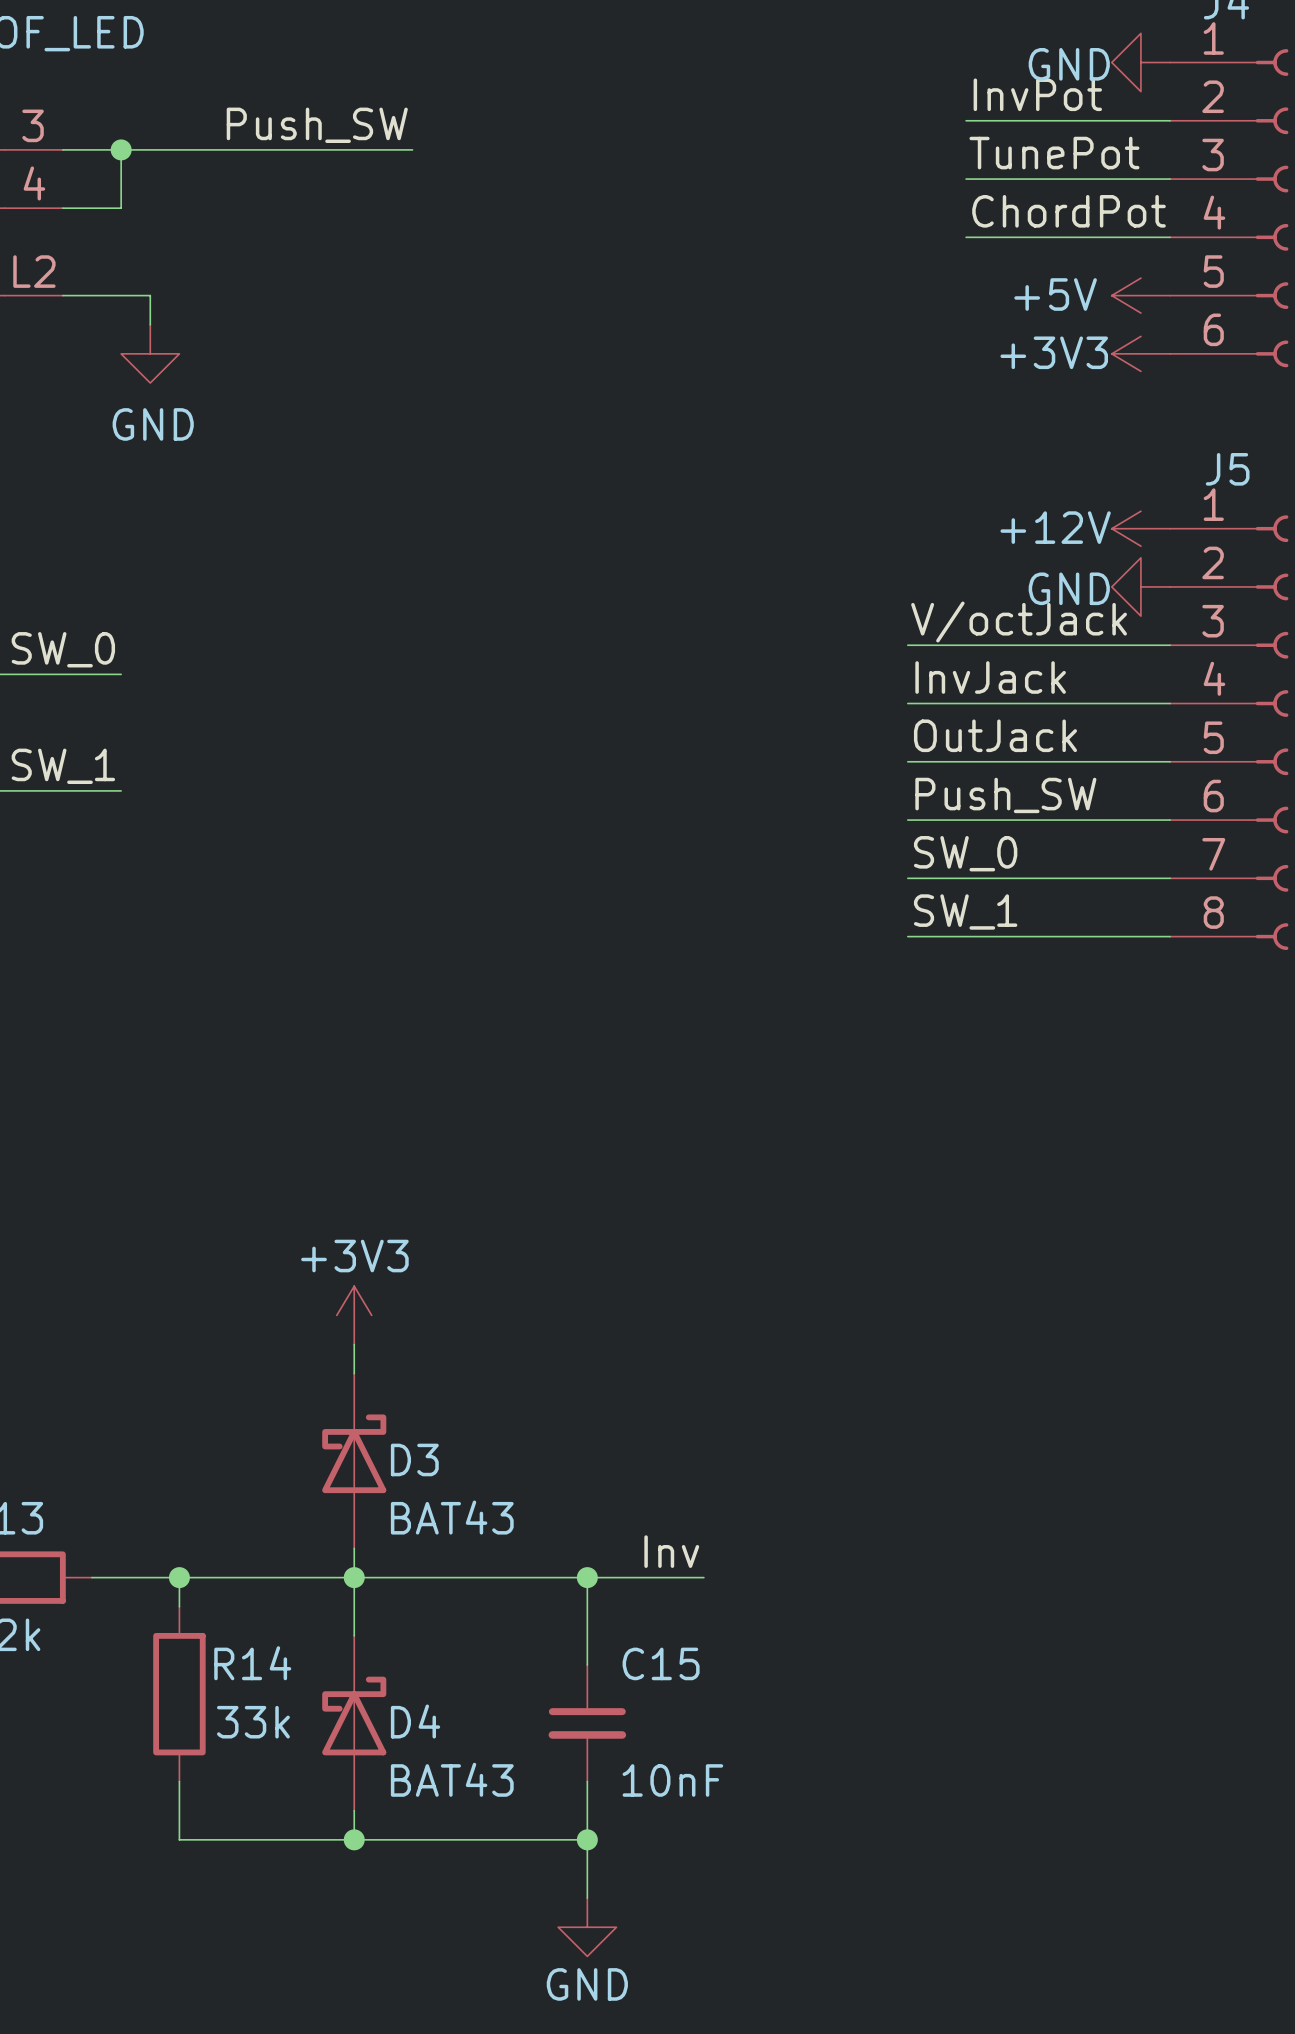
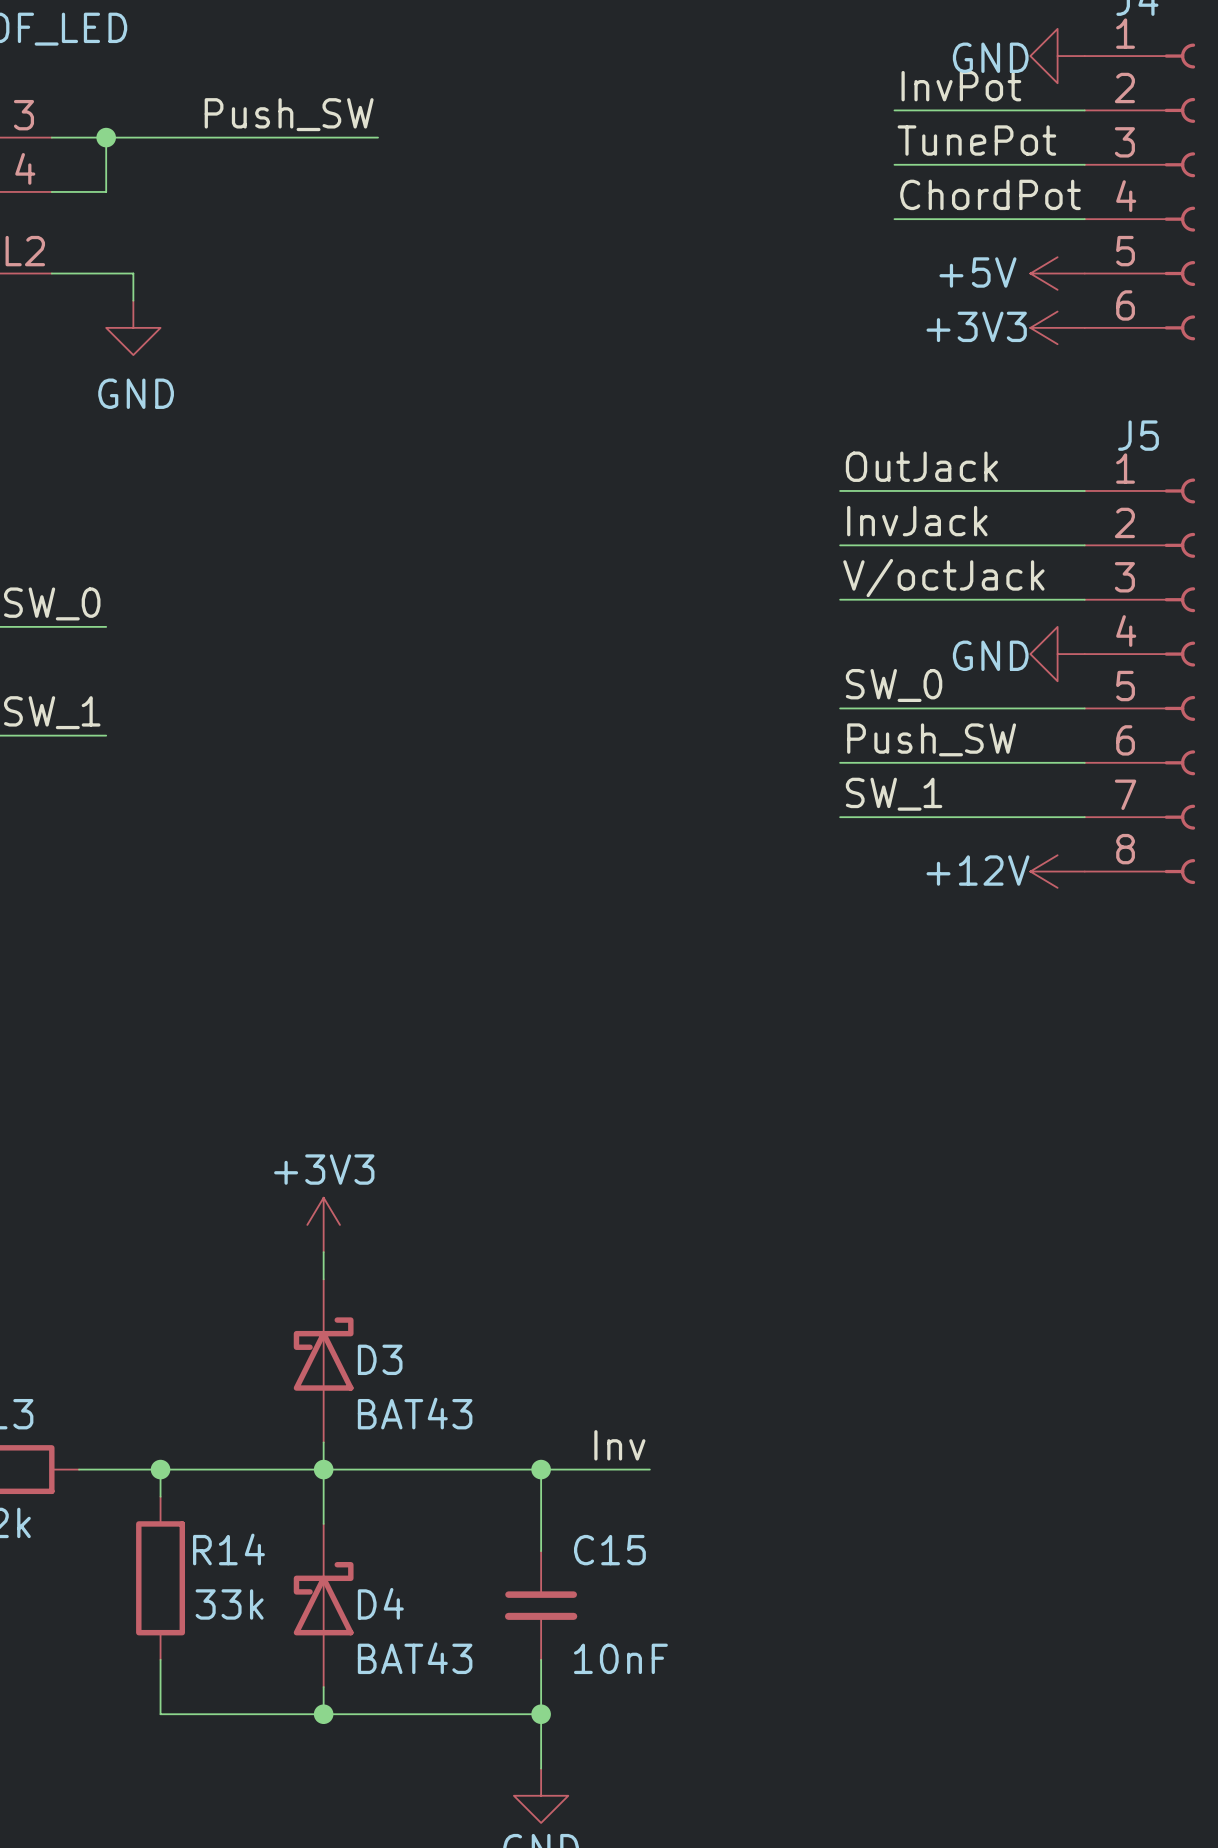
label: none -> OutJack (921, 466)
power symbol position: +12V (1140, 528) -> +12V (1057, 871)
power symbol position: GND (1140, 586) -> GND (1057, 654)
label position: InvJack (990, 677) -> InvJack (917, 521)
wire: (907, 703) (1170, 703) -> (840, 545) (1084, 545)
label: OutJack (995, 735) -> SW_0 (894, 685)
label: SW_0 (965, 853) -> SW_1 (894, 794)
label: SW_1 (965, 911) -> none
wire: (907, 936) (1170, 936) -> (840, 490) (1084, 490)

